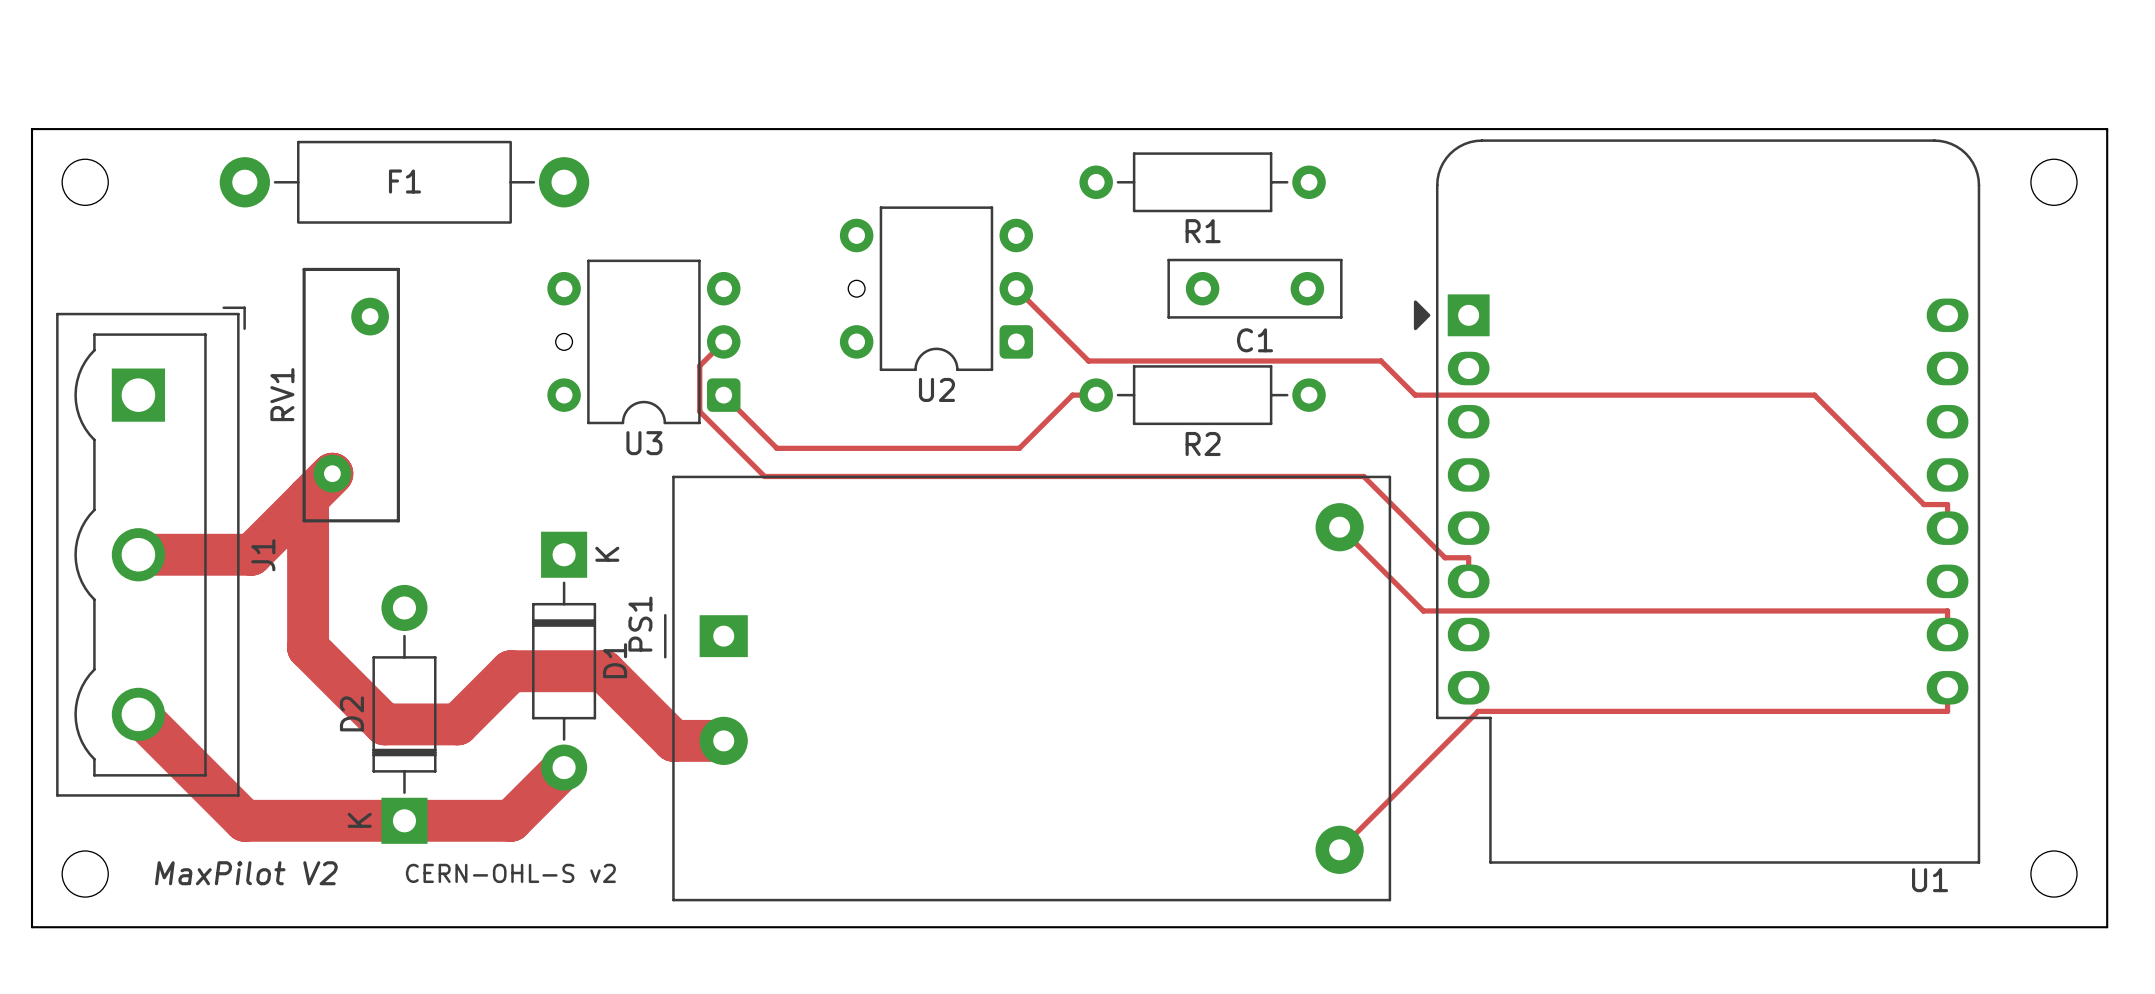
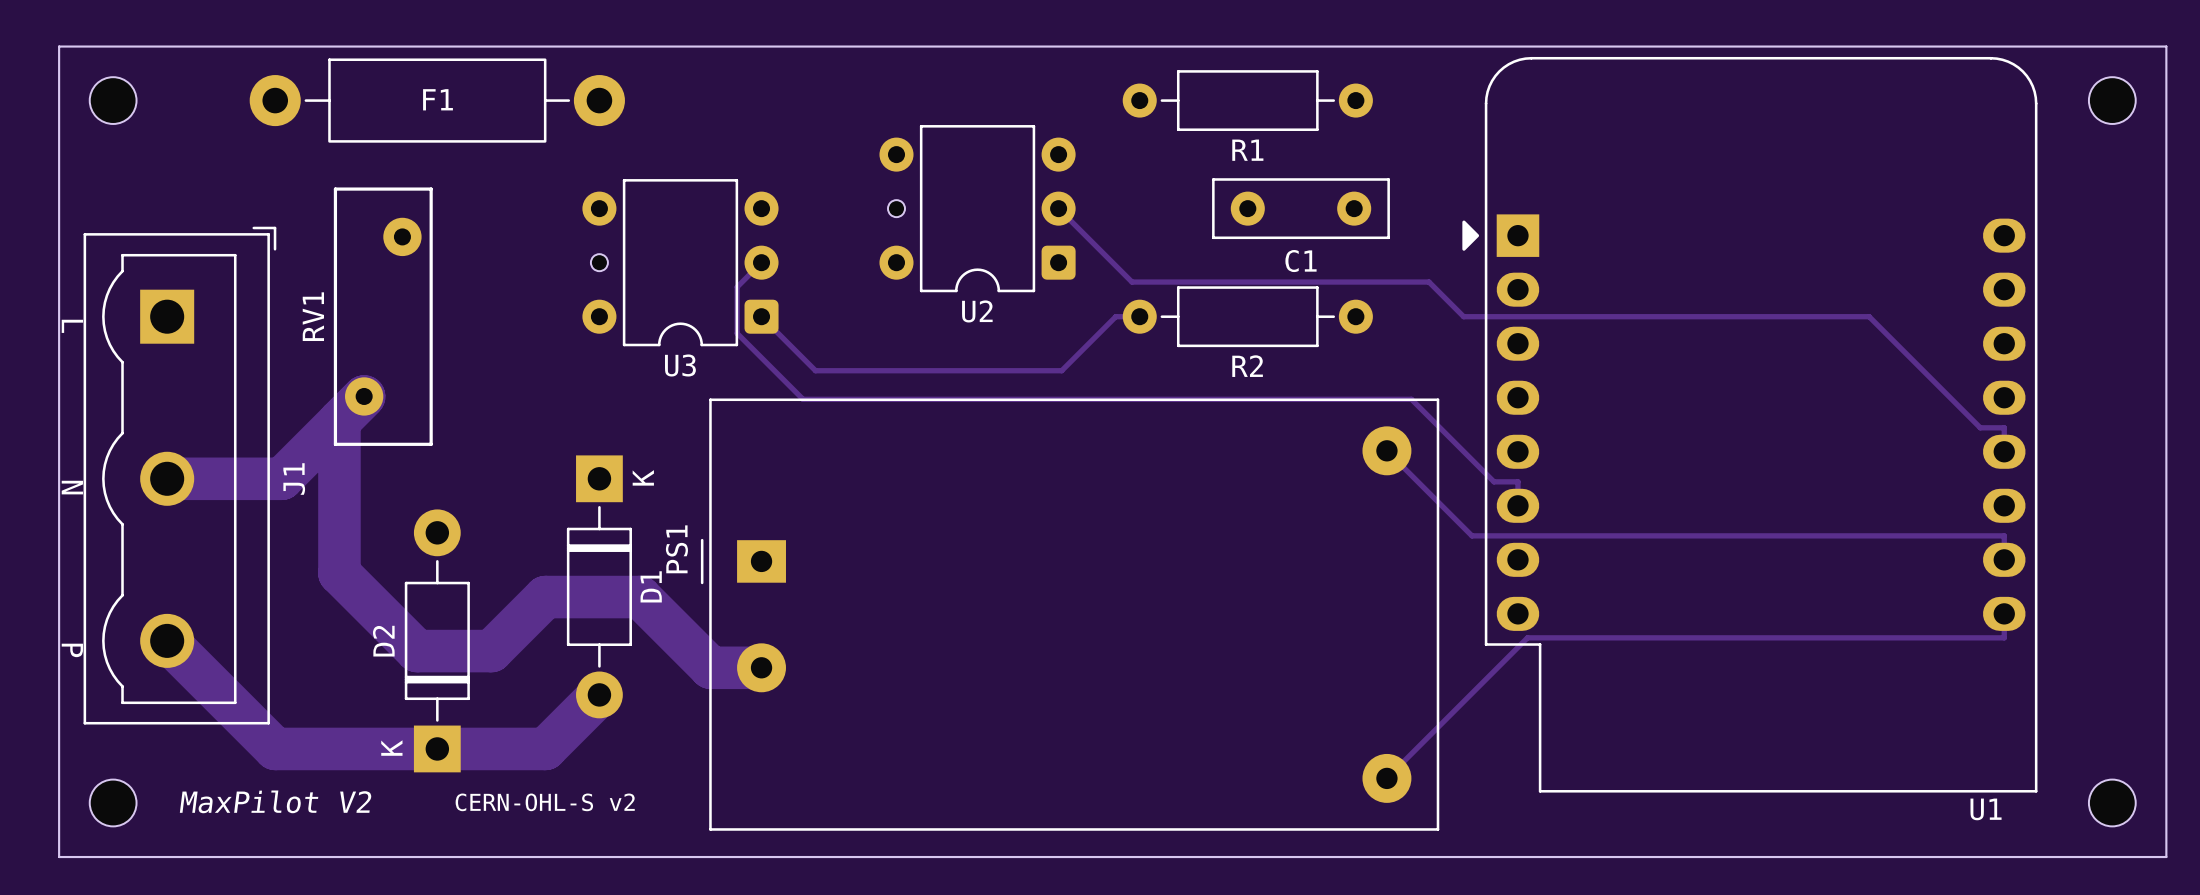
text: none -> L (72, 326)
text: none -> N (72, 487)
text: none -> P (72, 650)

